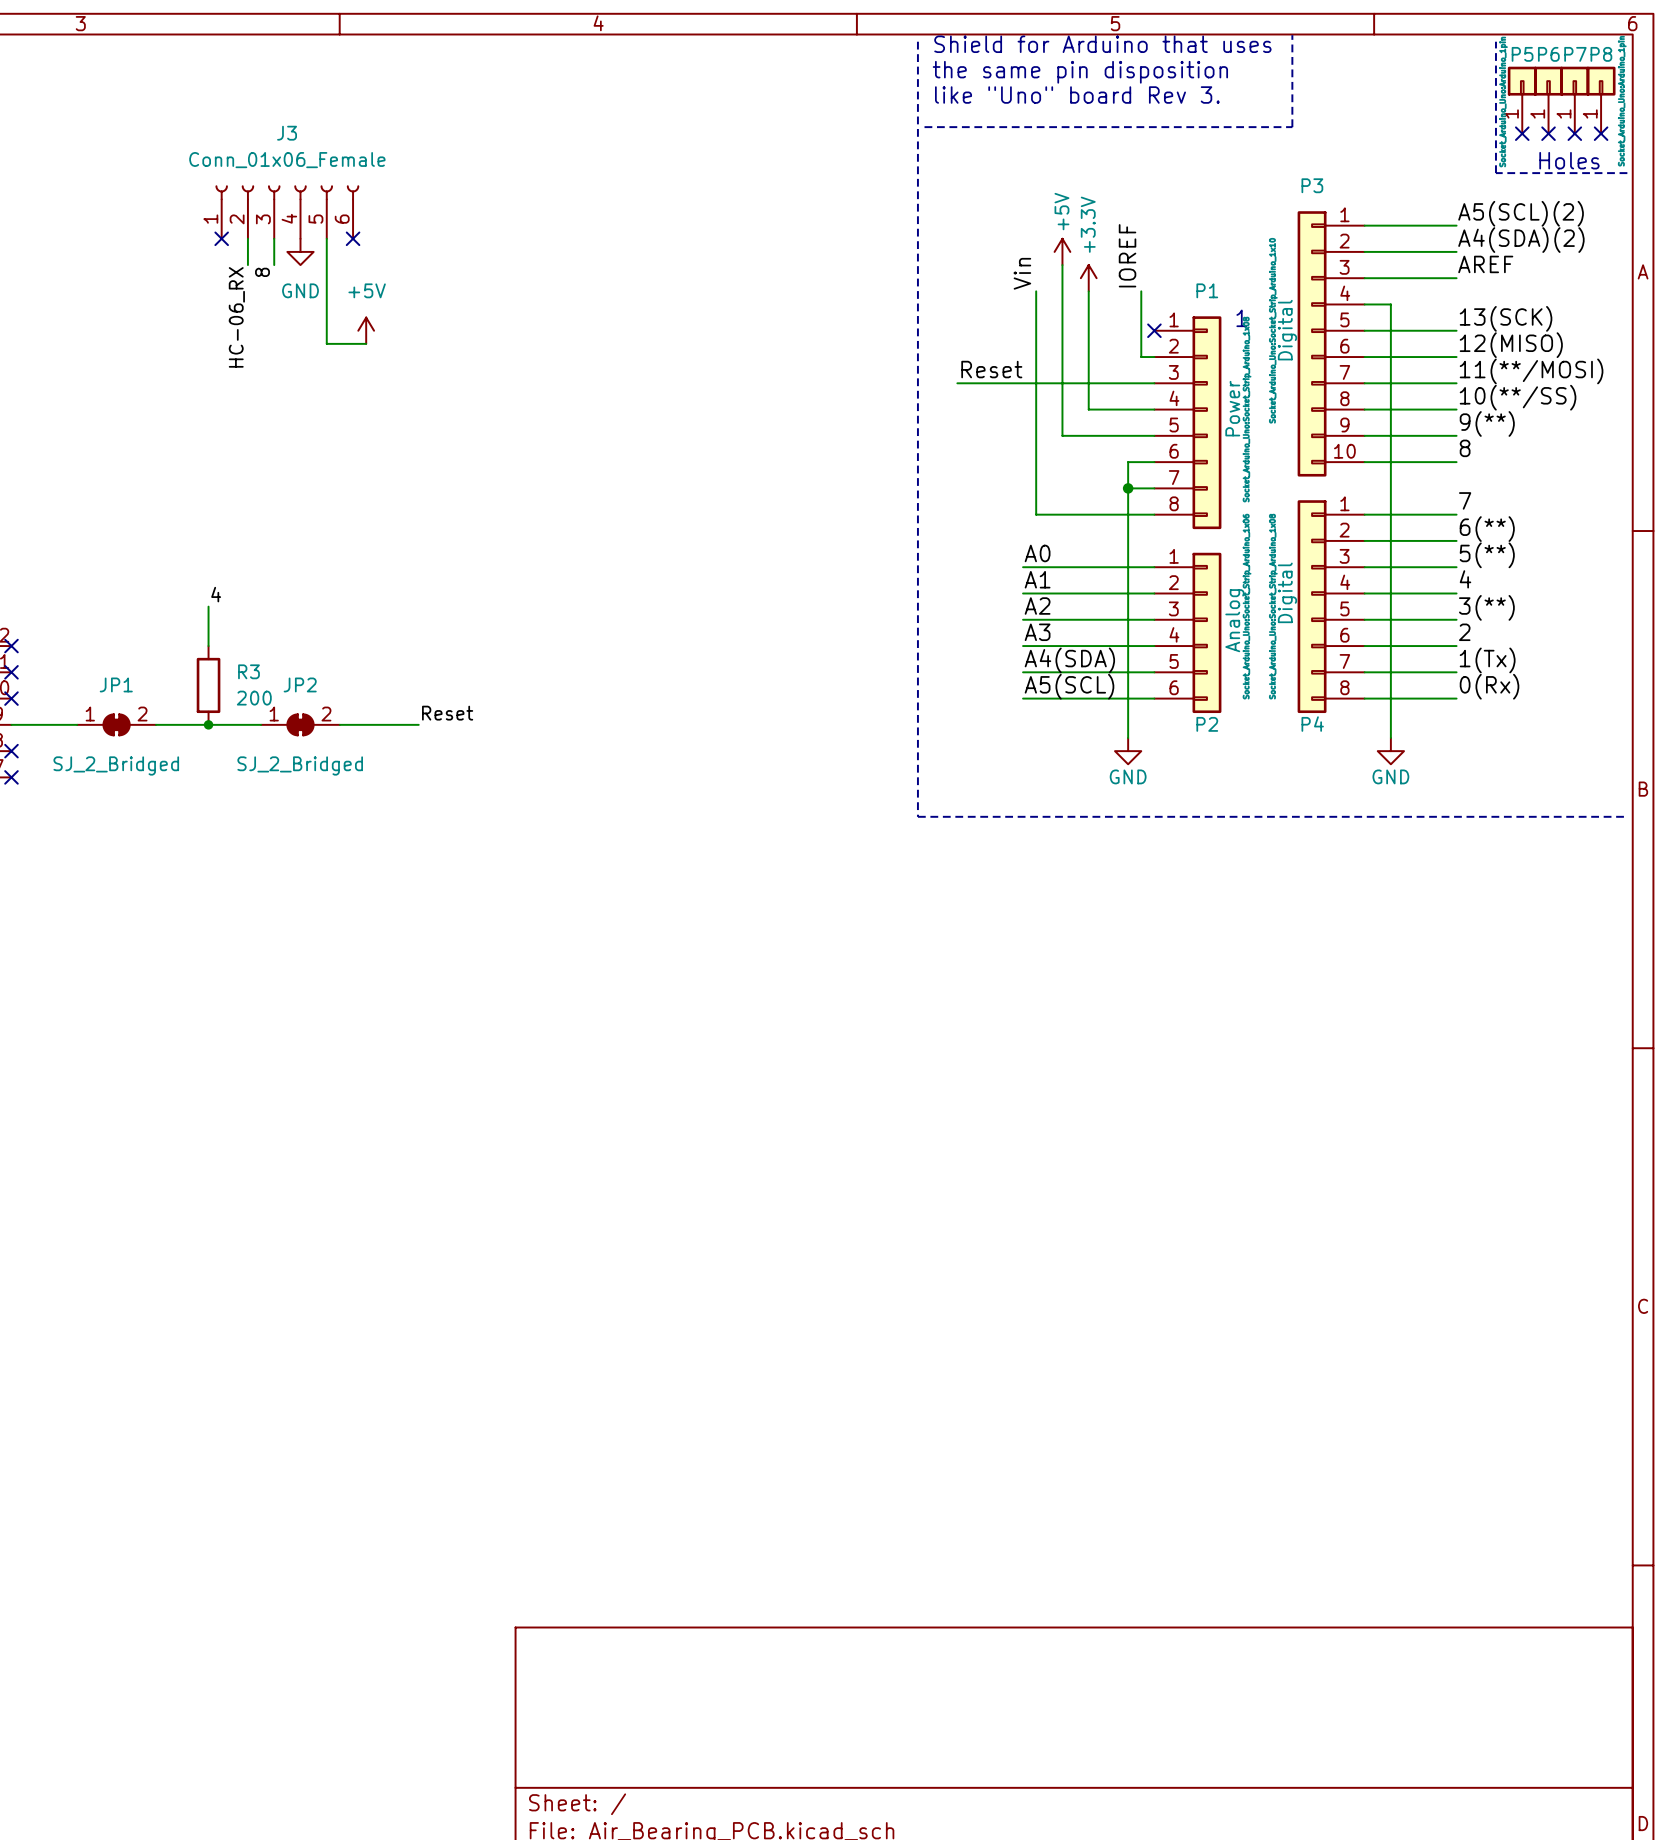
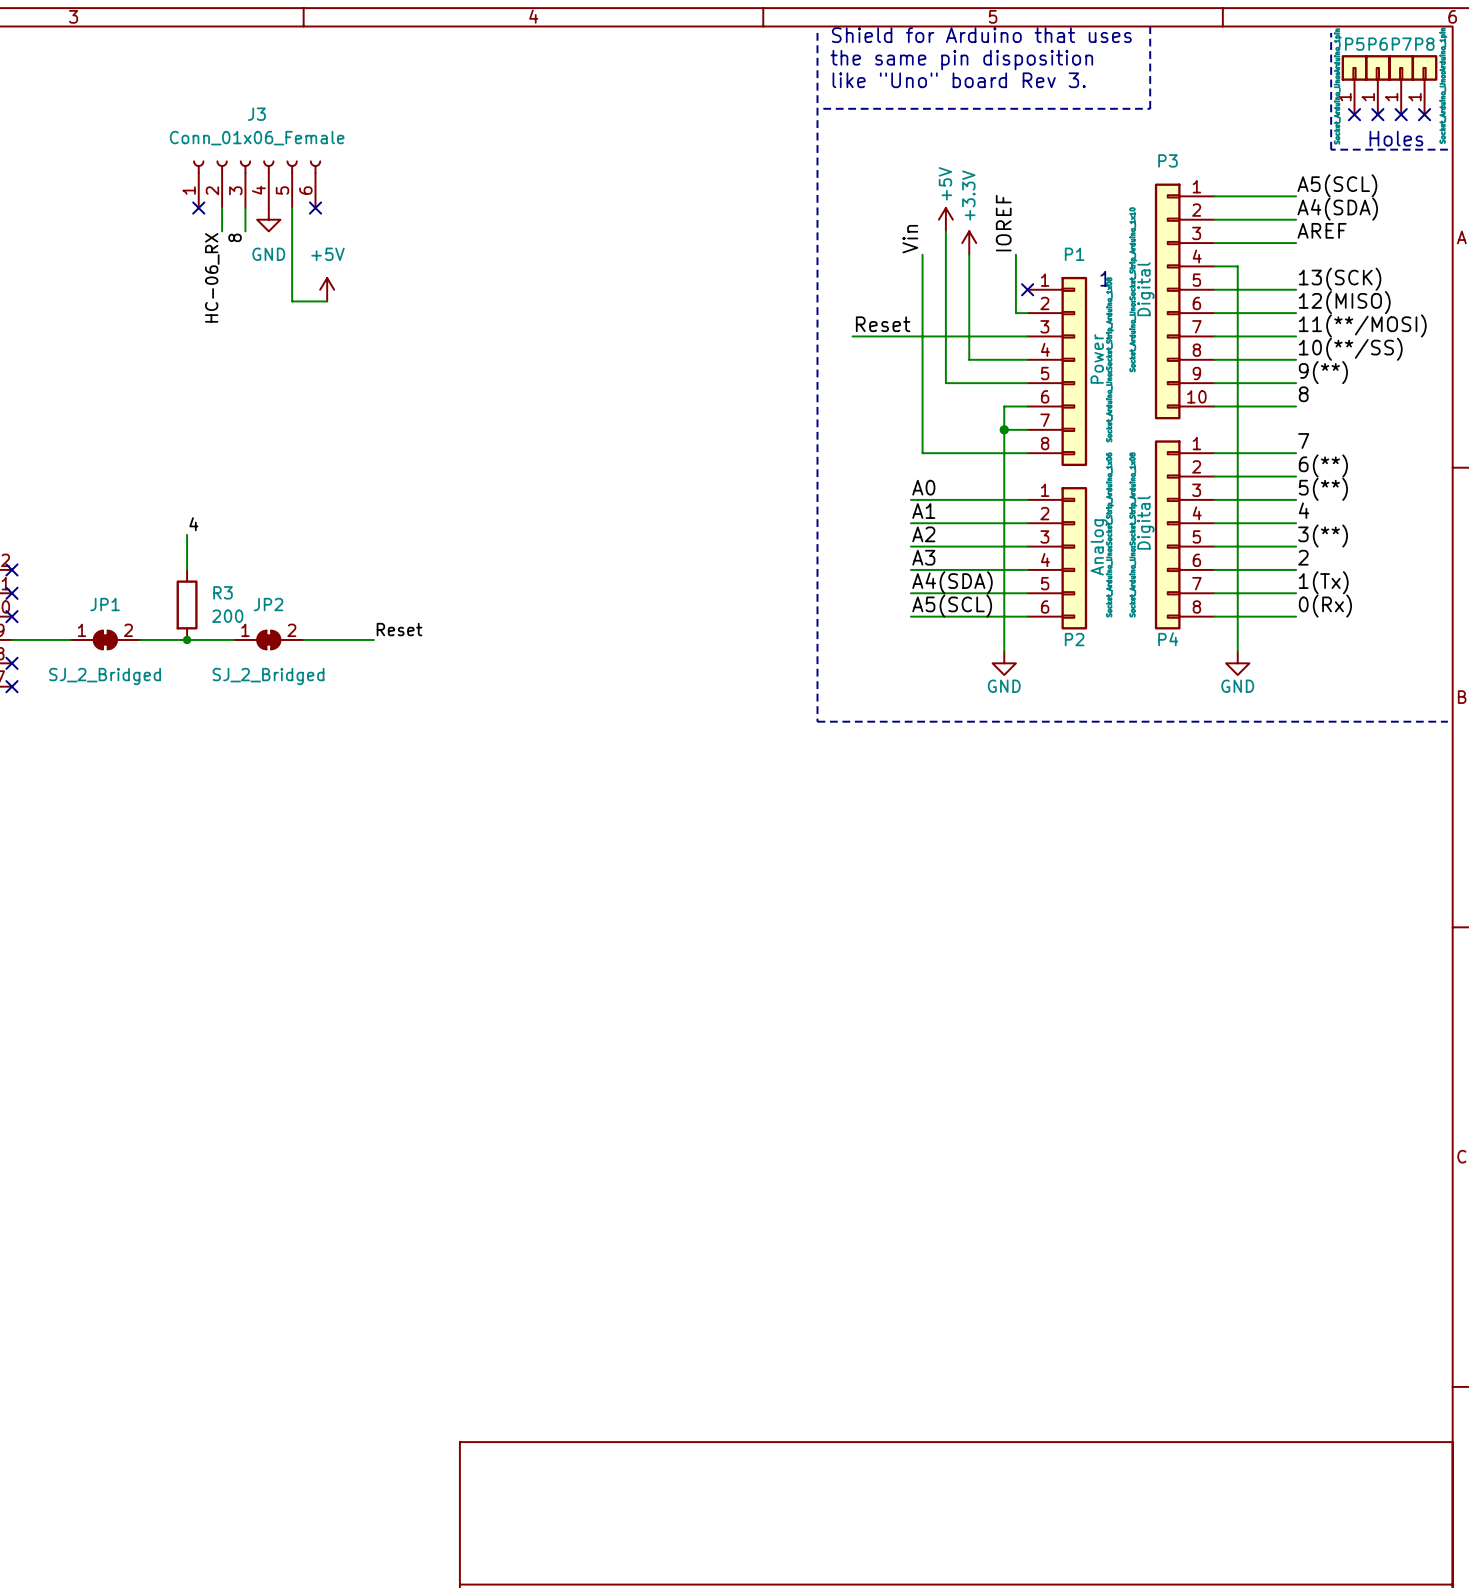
label: A5(SCL)(2) (1521, 213) -> A5(SCL) (1337, 185)
label: A4(SDA)(2) (1521, 240) -> A4(SDA) (1337, 209)

